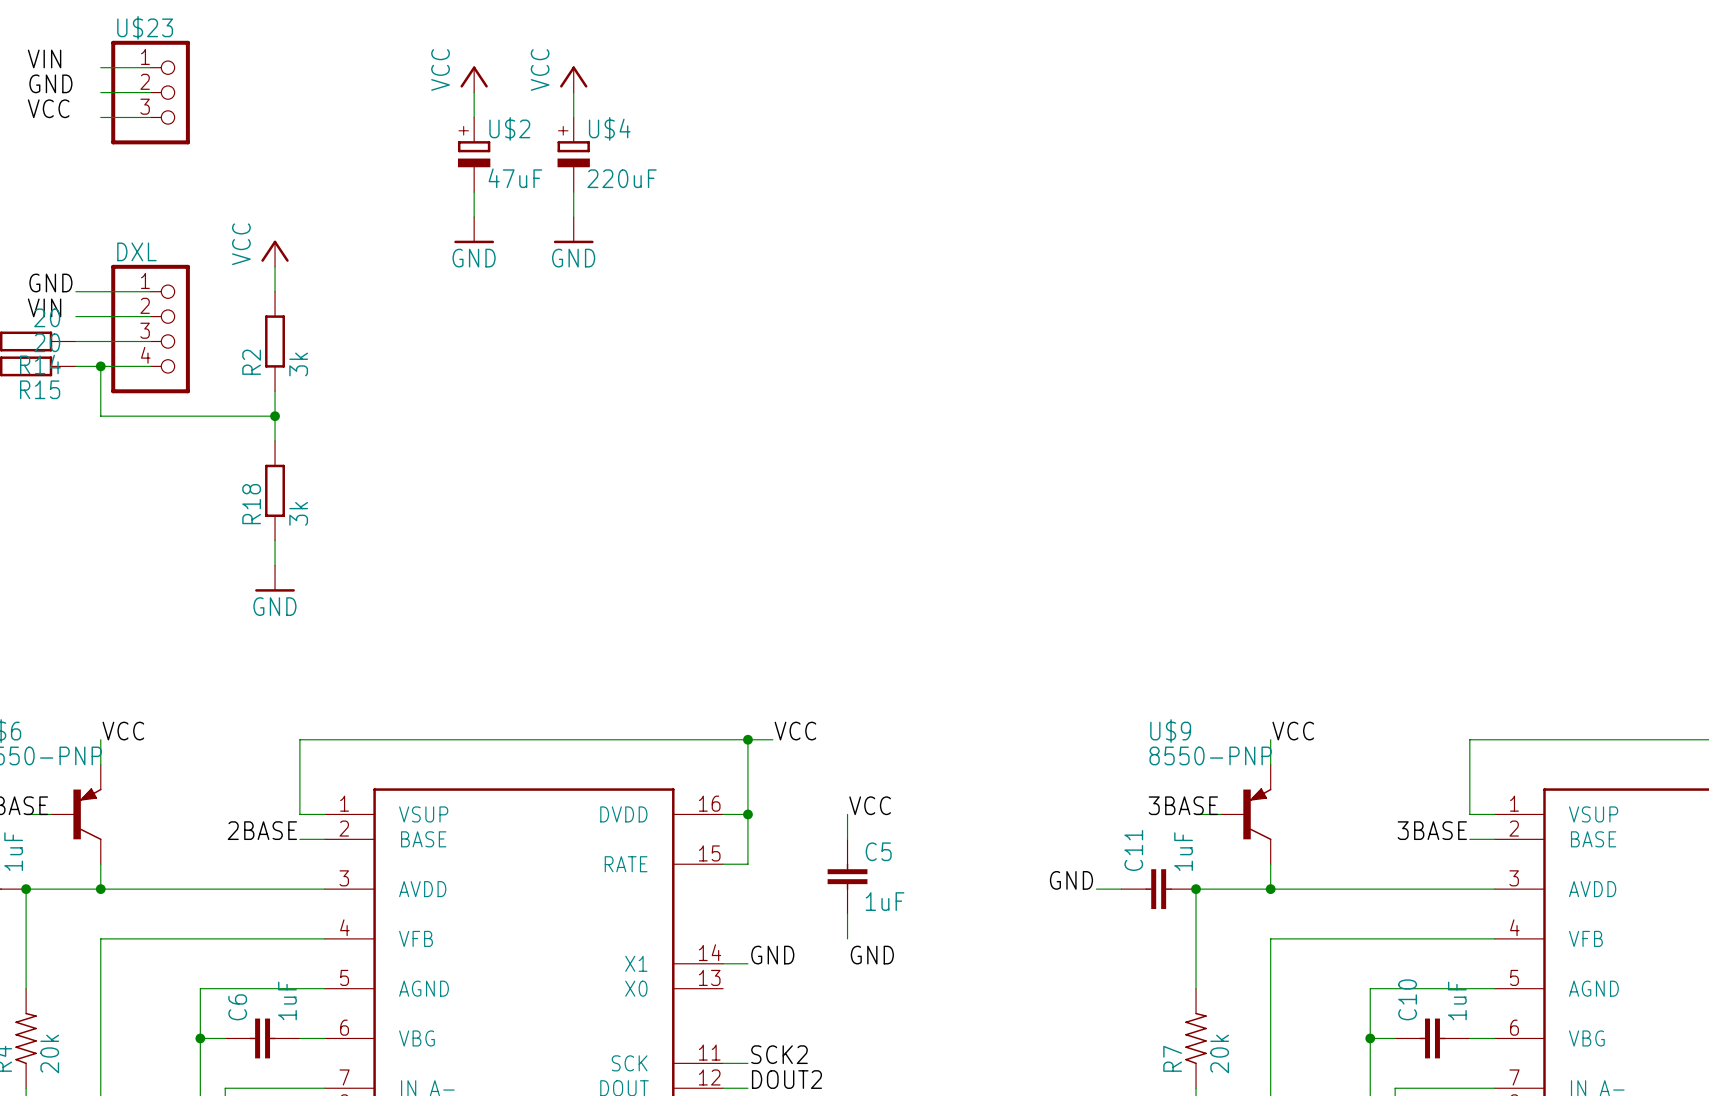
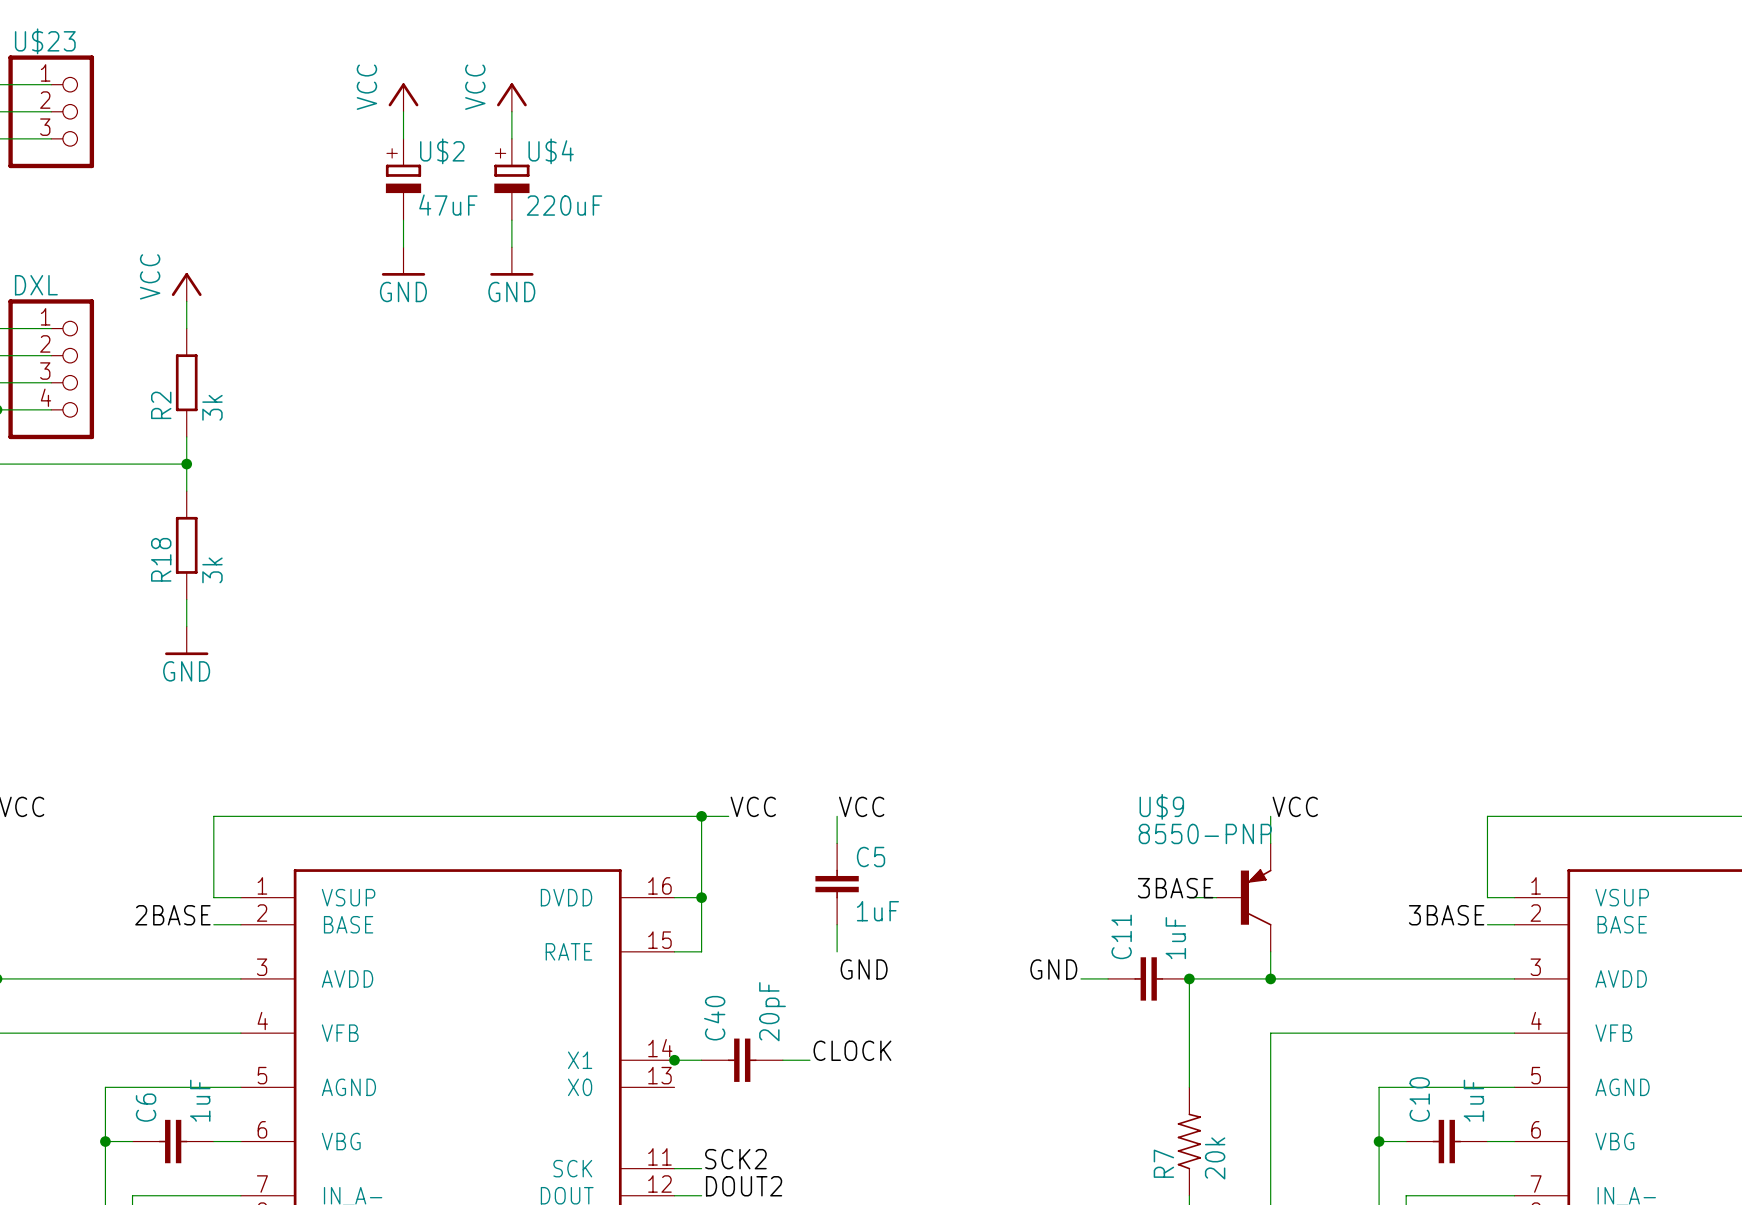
label position: VCC (870, 805) -> VCC (861, 806)
wire: (847, 814) (847, 839) -> (837, 924) (837, 951)
C5 position: (847, 876) -> (837, 884)
wire: (847, 914) (847, 938) -> (837, 816) (837, 843)
label position: GND (772, 955) -> GND (864, 969)
label: GND (872, 955) -> CLOCK (852, 1050)
junction: none -> (674, 1060)
C40: none -> 20pF (742, 1060)
wire: none -> (782, 1060) (809, 1060)

